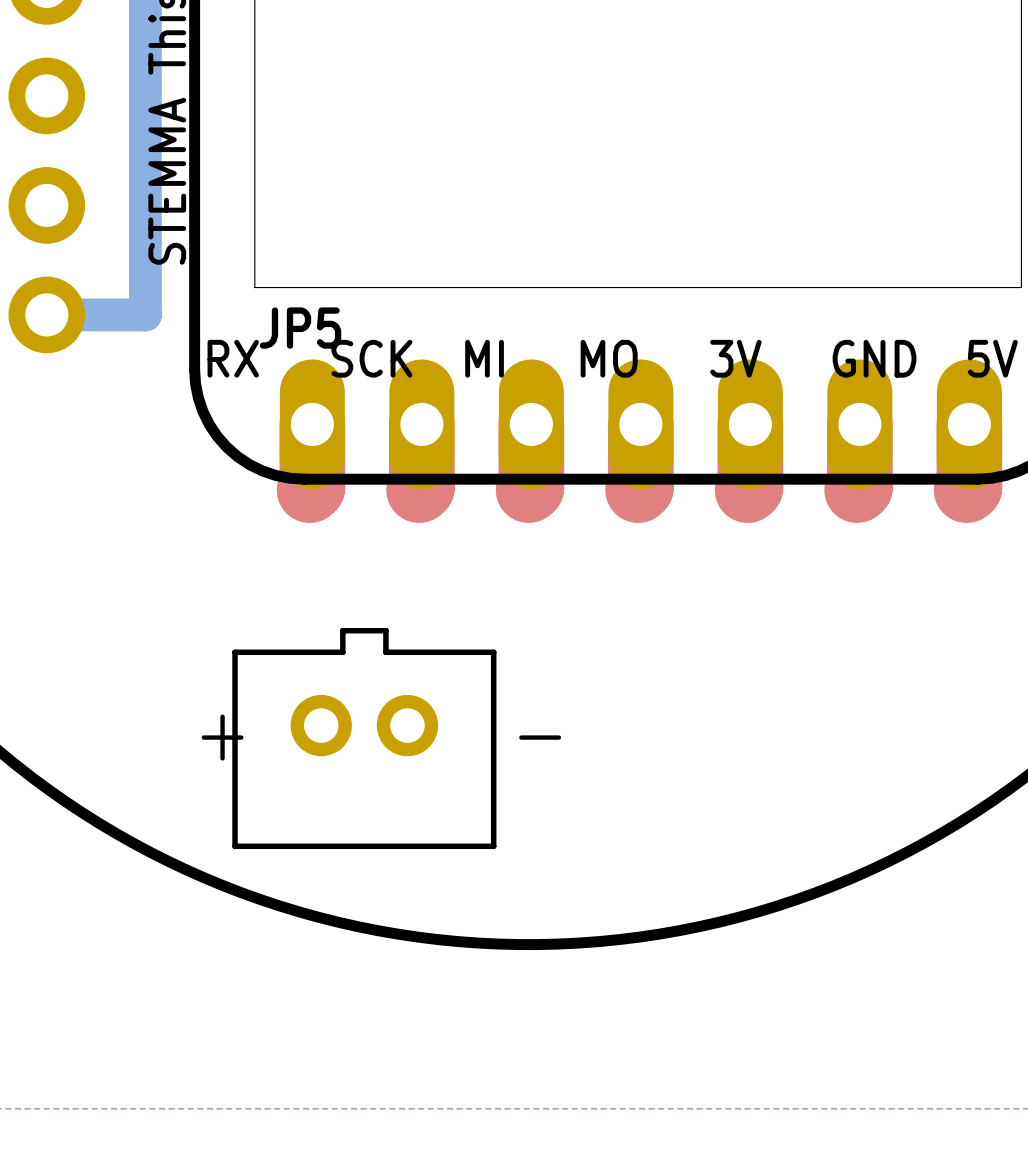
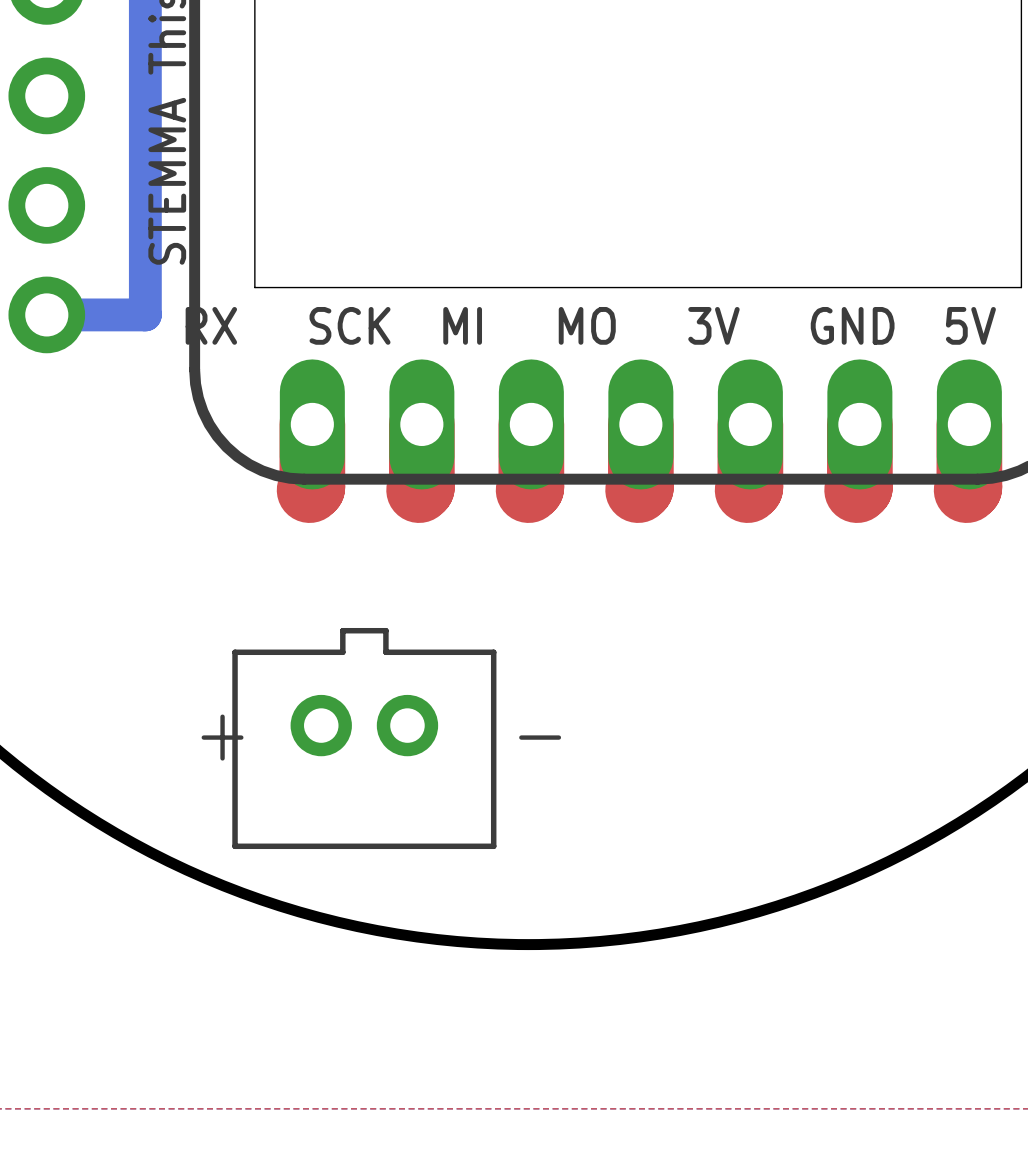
JP5 name: JP5 (300, 328) -> none
text position: RX SCK MI MO 3V GND 5V (612, 358) -> RX SCK MI MO 3V GND 5V (590, 325)

